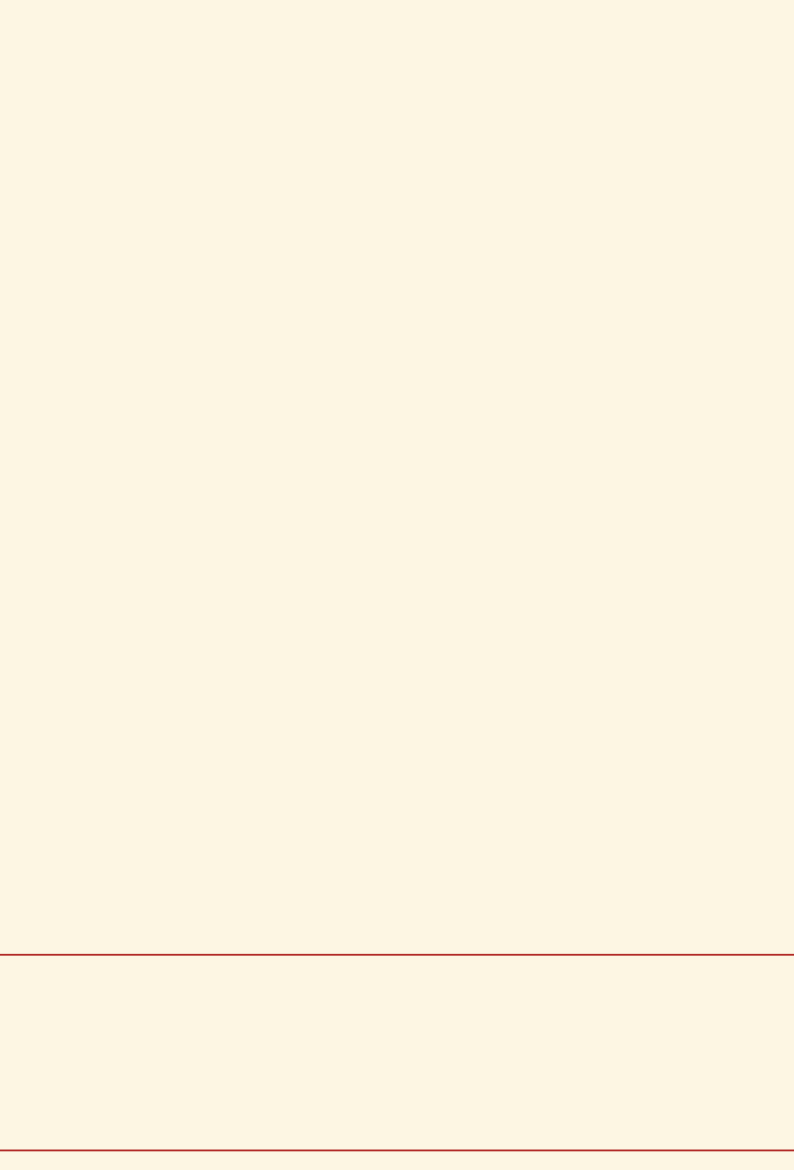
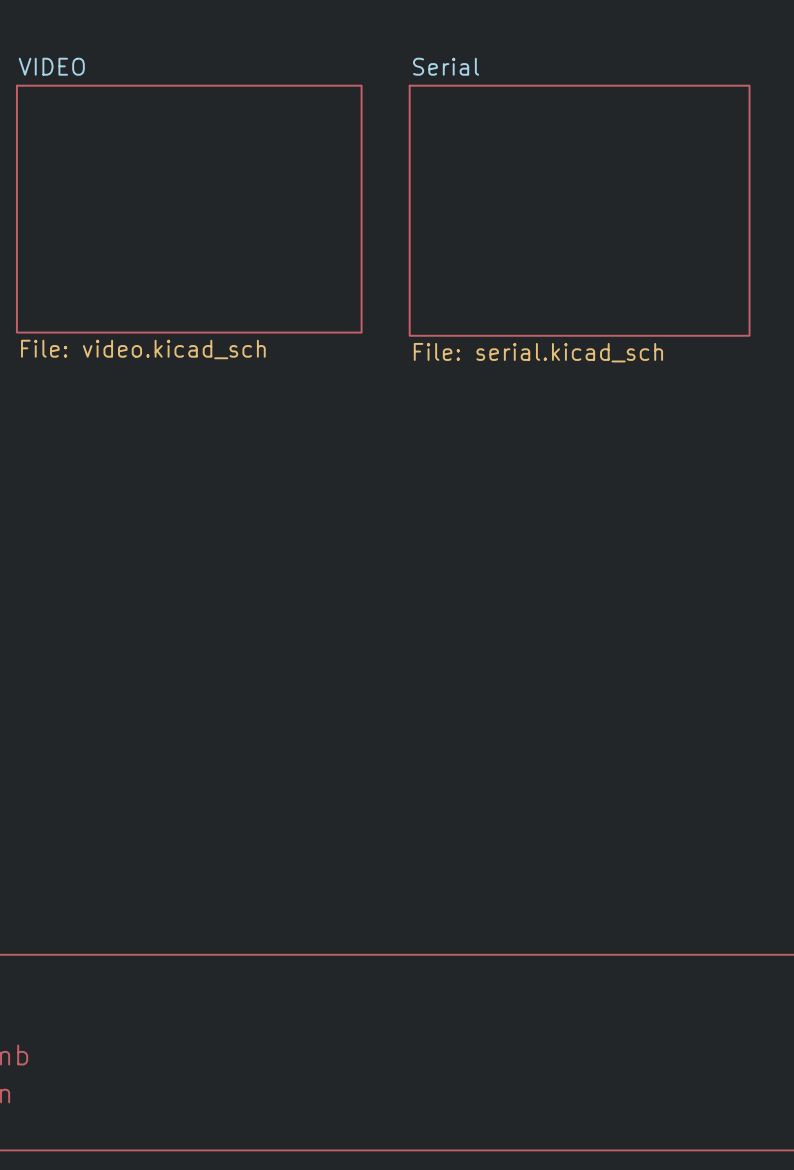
sheet VIDEO: none -> File: video.kicad_sch (189, 209)
sheet Serial: none -> File: serial.kicad_sch (579, 210)

